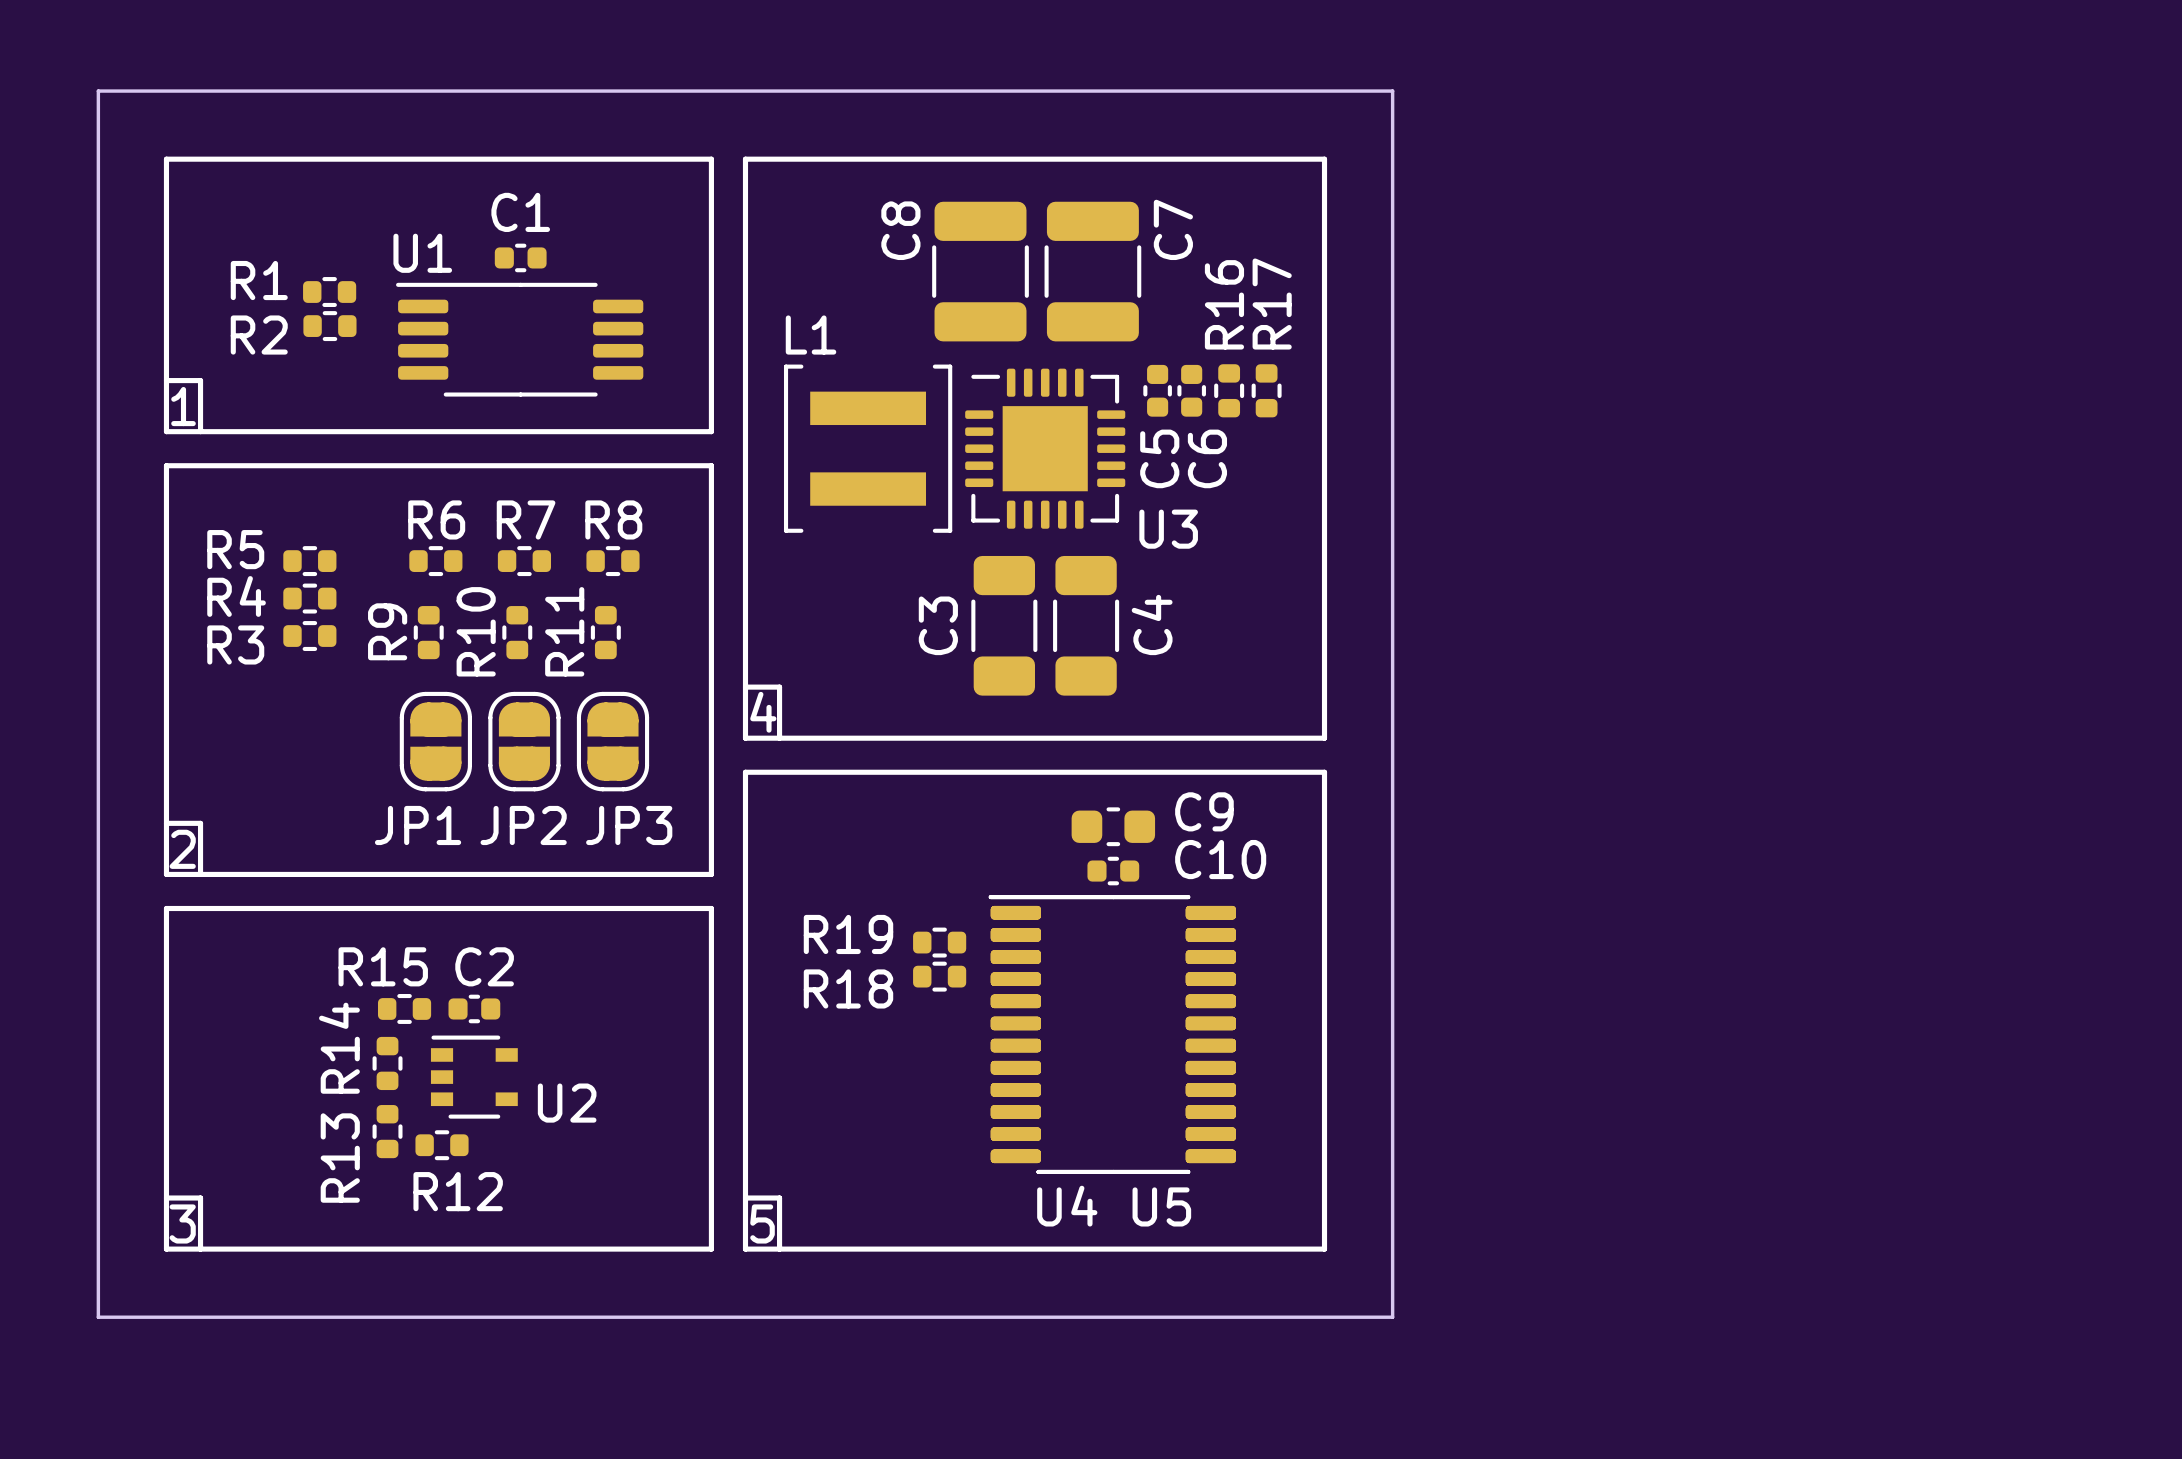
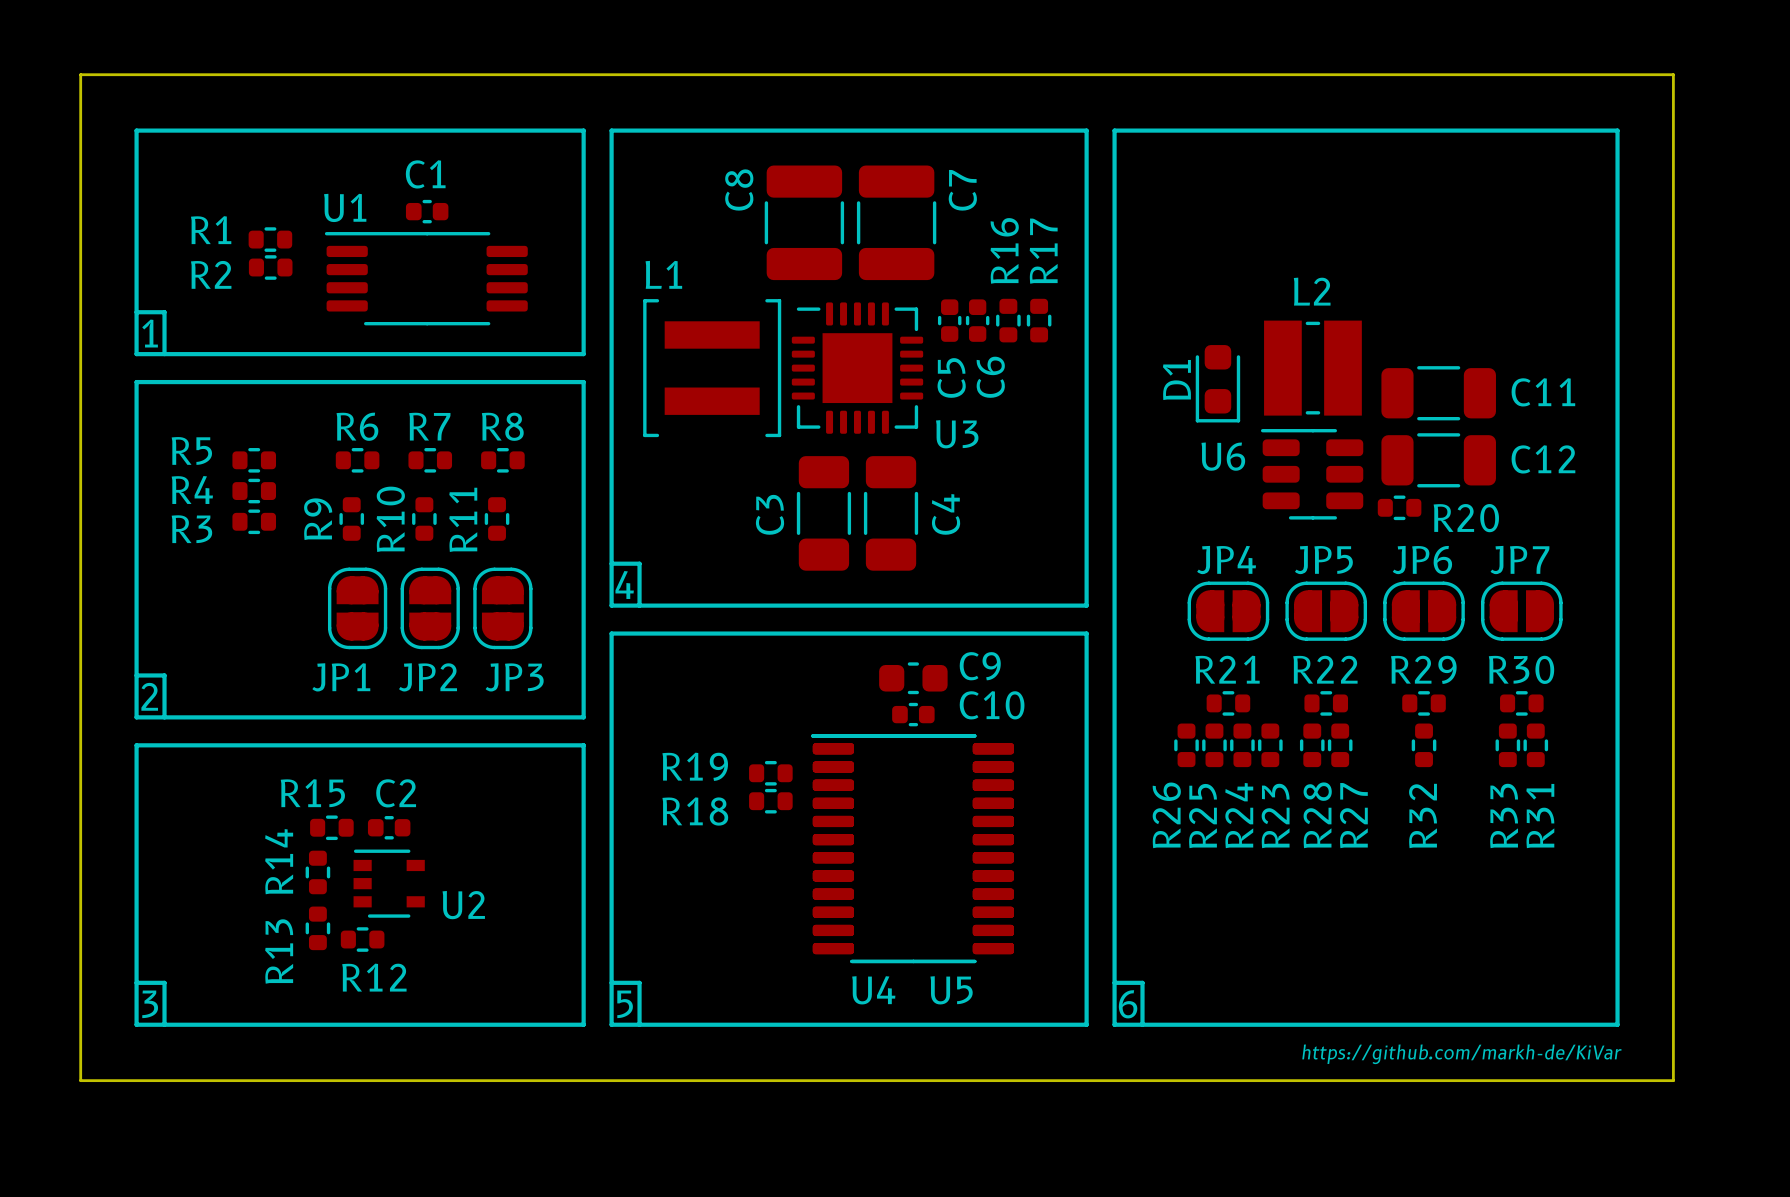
board edge: (1392, 91) (1392, 1317) -> (1142, 74) (1673, 74) (1673, 1080) (1142, 1080)
line: none -> (1114, 130) (1617, 130) (1617, 1024) (1114, 1024) (1114, 130)
L2: none -> (1312, 368)
D1: none -> (1217, 383)
C11: none -> (1438, 393)
C12: none -> (1438, 460)
U6: none -> (1312, 474)
R20: none -> (1399, 507)
JP4: none -> (1228, 611)
JP5: none -> (1326, 611)
JP6: none -> (1424, 611)
JP7: none -> (1521, 611)
R21: none -> (1228, 703)
R22: none -> (1326, 703)
R29: none -> (1424, 703)
R30: none -> (1521, 703)
R26: none -> (1186, 745)
R25: none -> (1214, 745)
R24: none -> (1242, 745)
R23: none -> (1270, 745)
R28: none -> (1312, 745)
R27: none -> (1340, 745)
R32: none -> (1424, 745)
R33: none -> (1507, 745)
R31: none -> (1535, 745)
line: none -> (1114, 982) (1142, 982) (1142, 1024)
text: none -> 6 (1128, 1004)
text: none -> https://github.com/markh-de/KiVar (1461, 1054)

